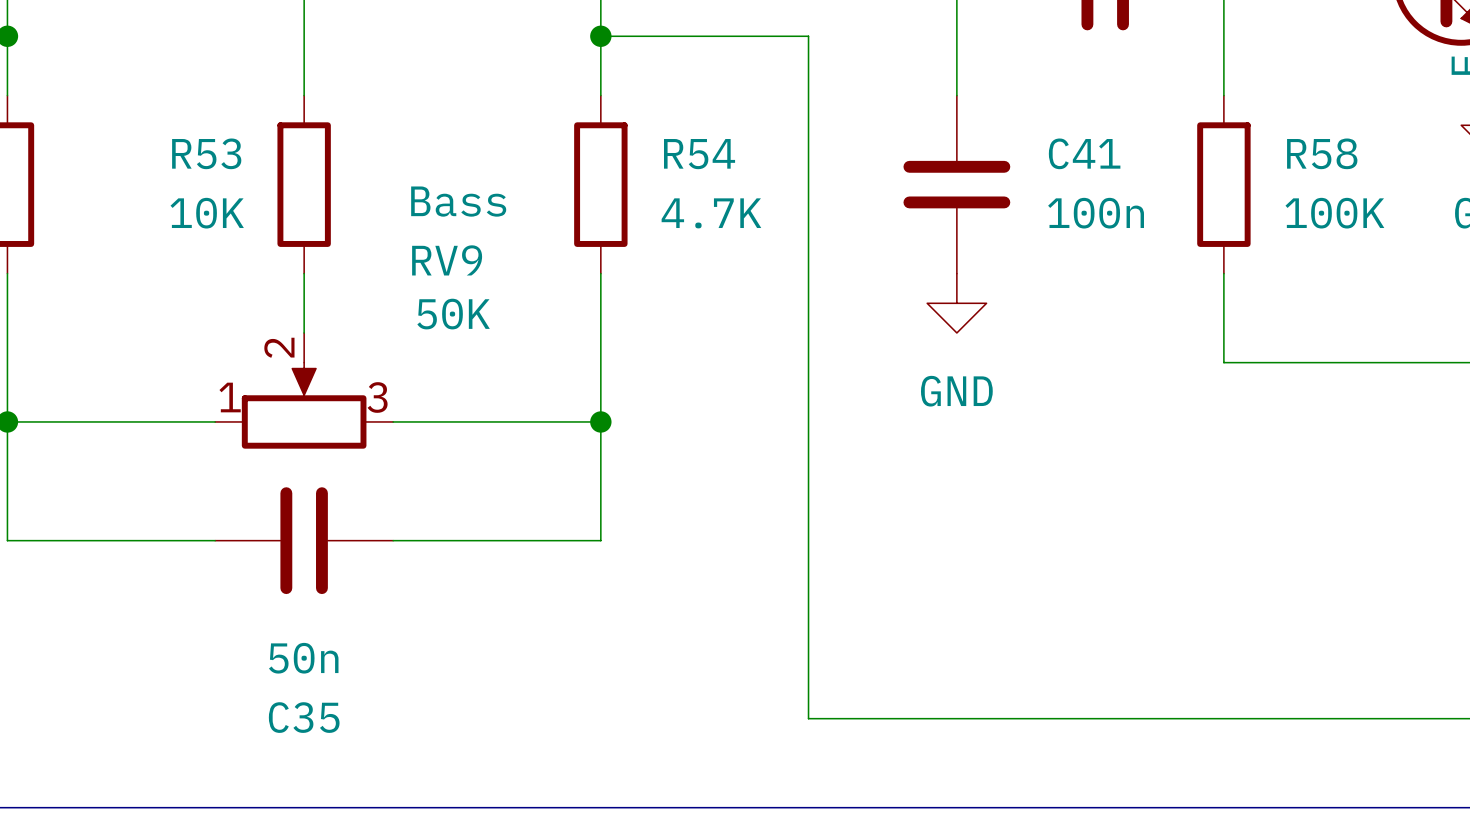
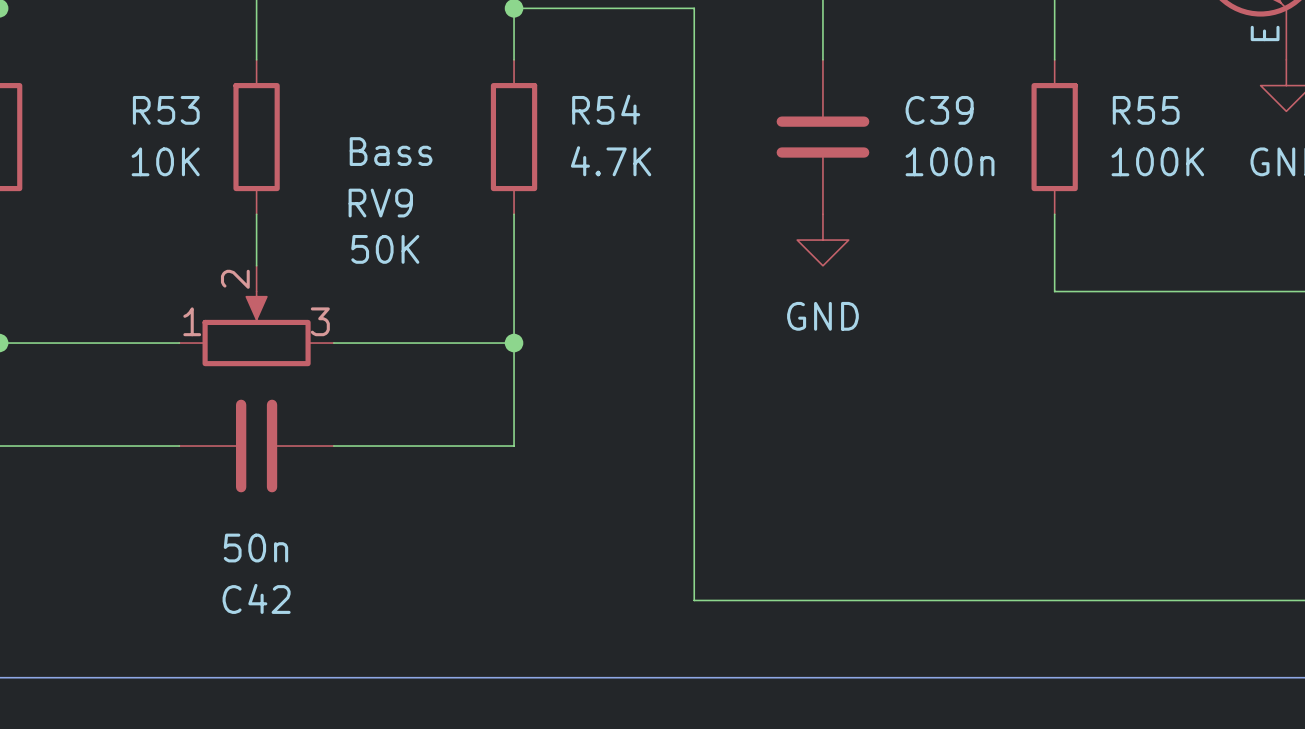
C41 name: C41 (1084, 153) -> C39 (939, 110)
R58 name: R58 (1322, 153) -> R55 (1146, 110)
C35 name: C35 (304, 717) -> C42 (256, 598)

